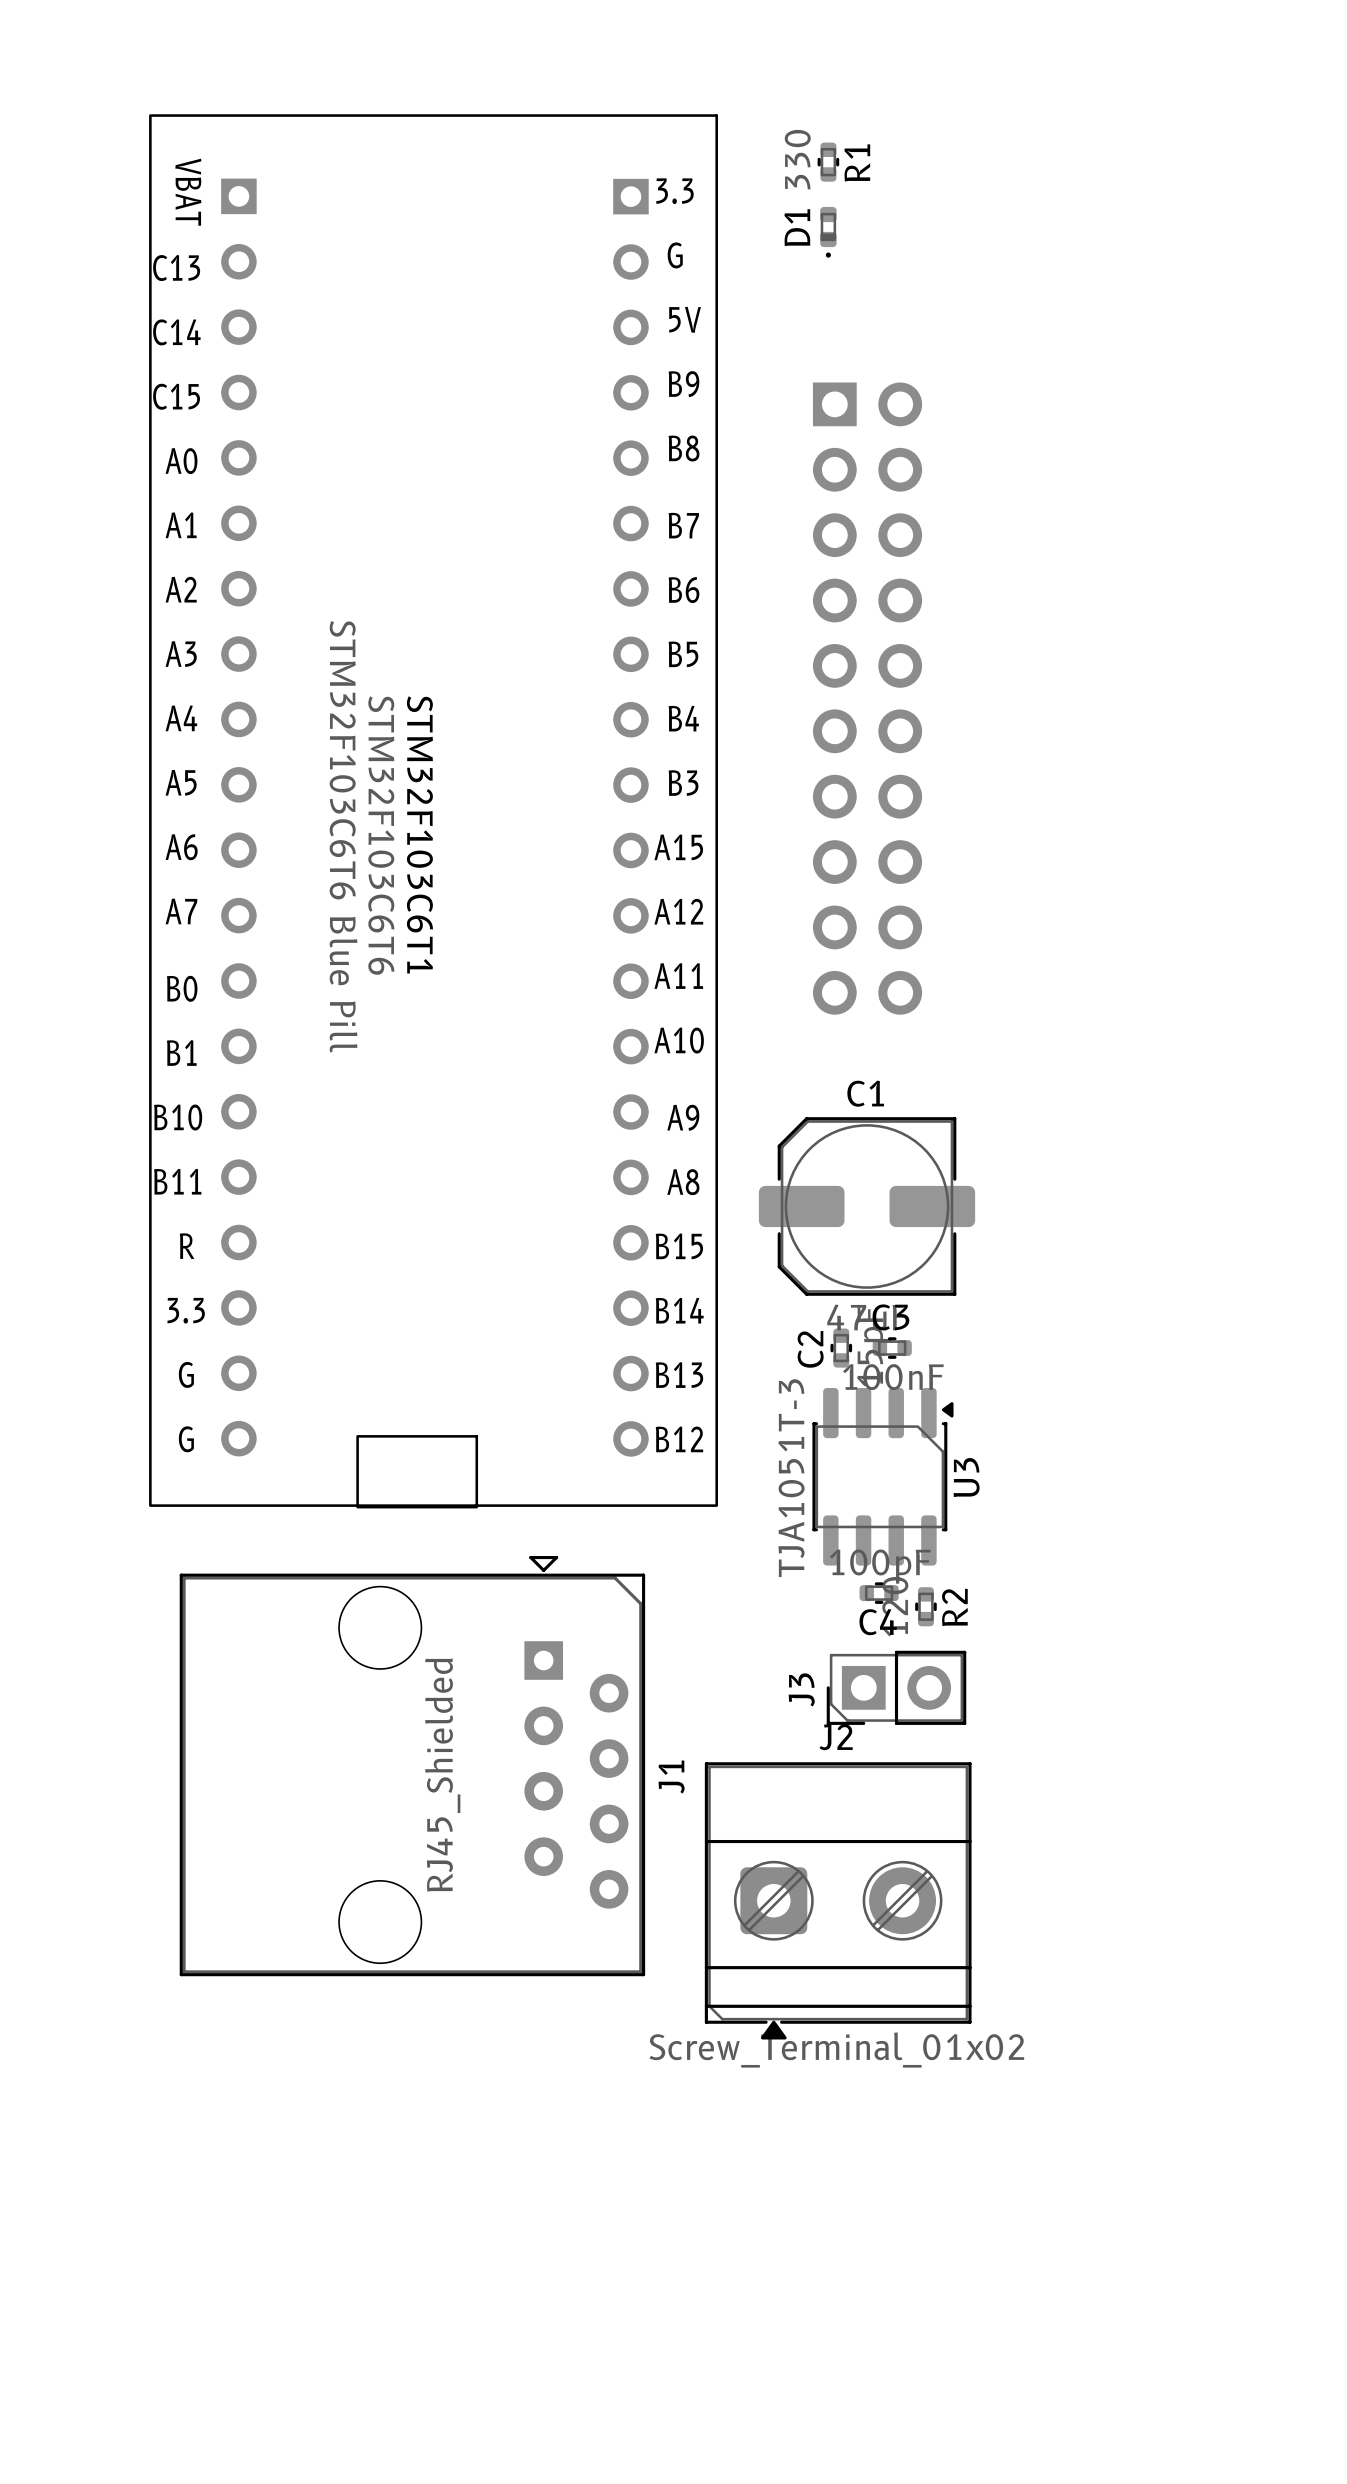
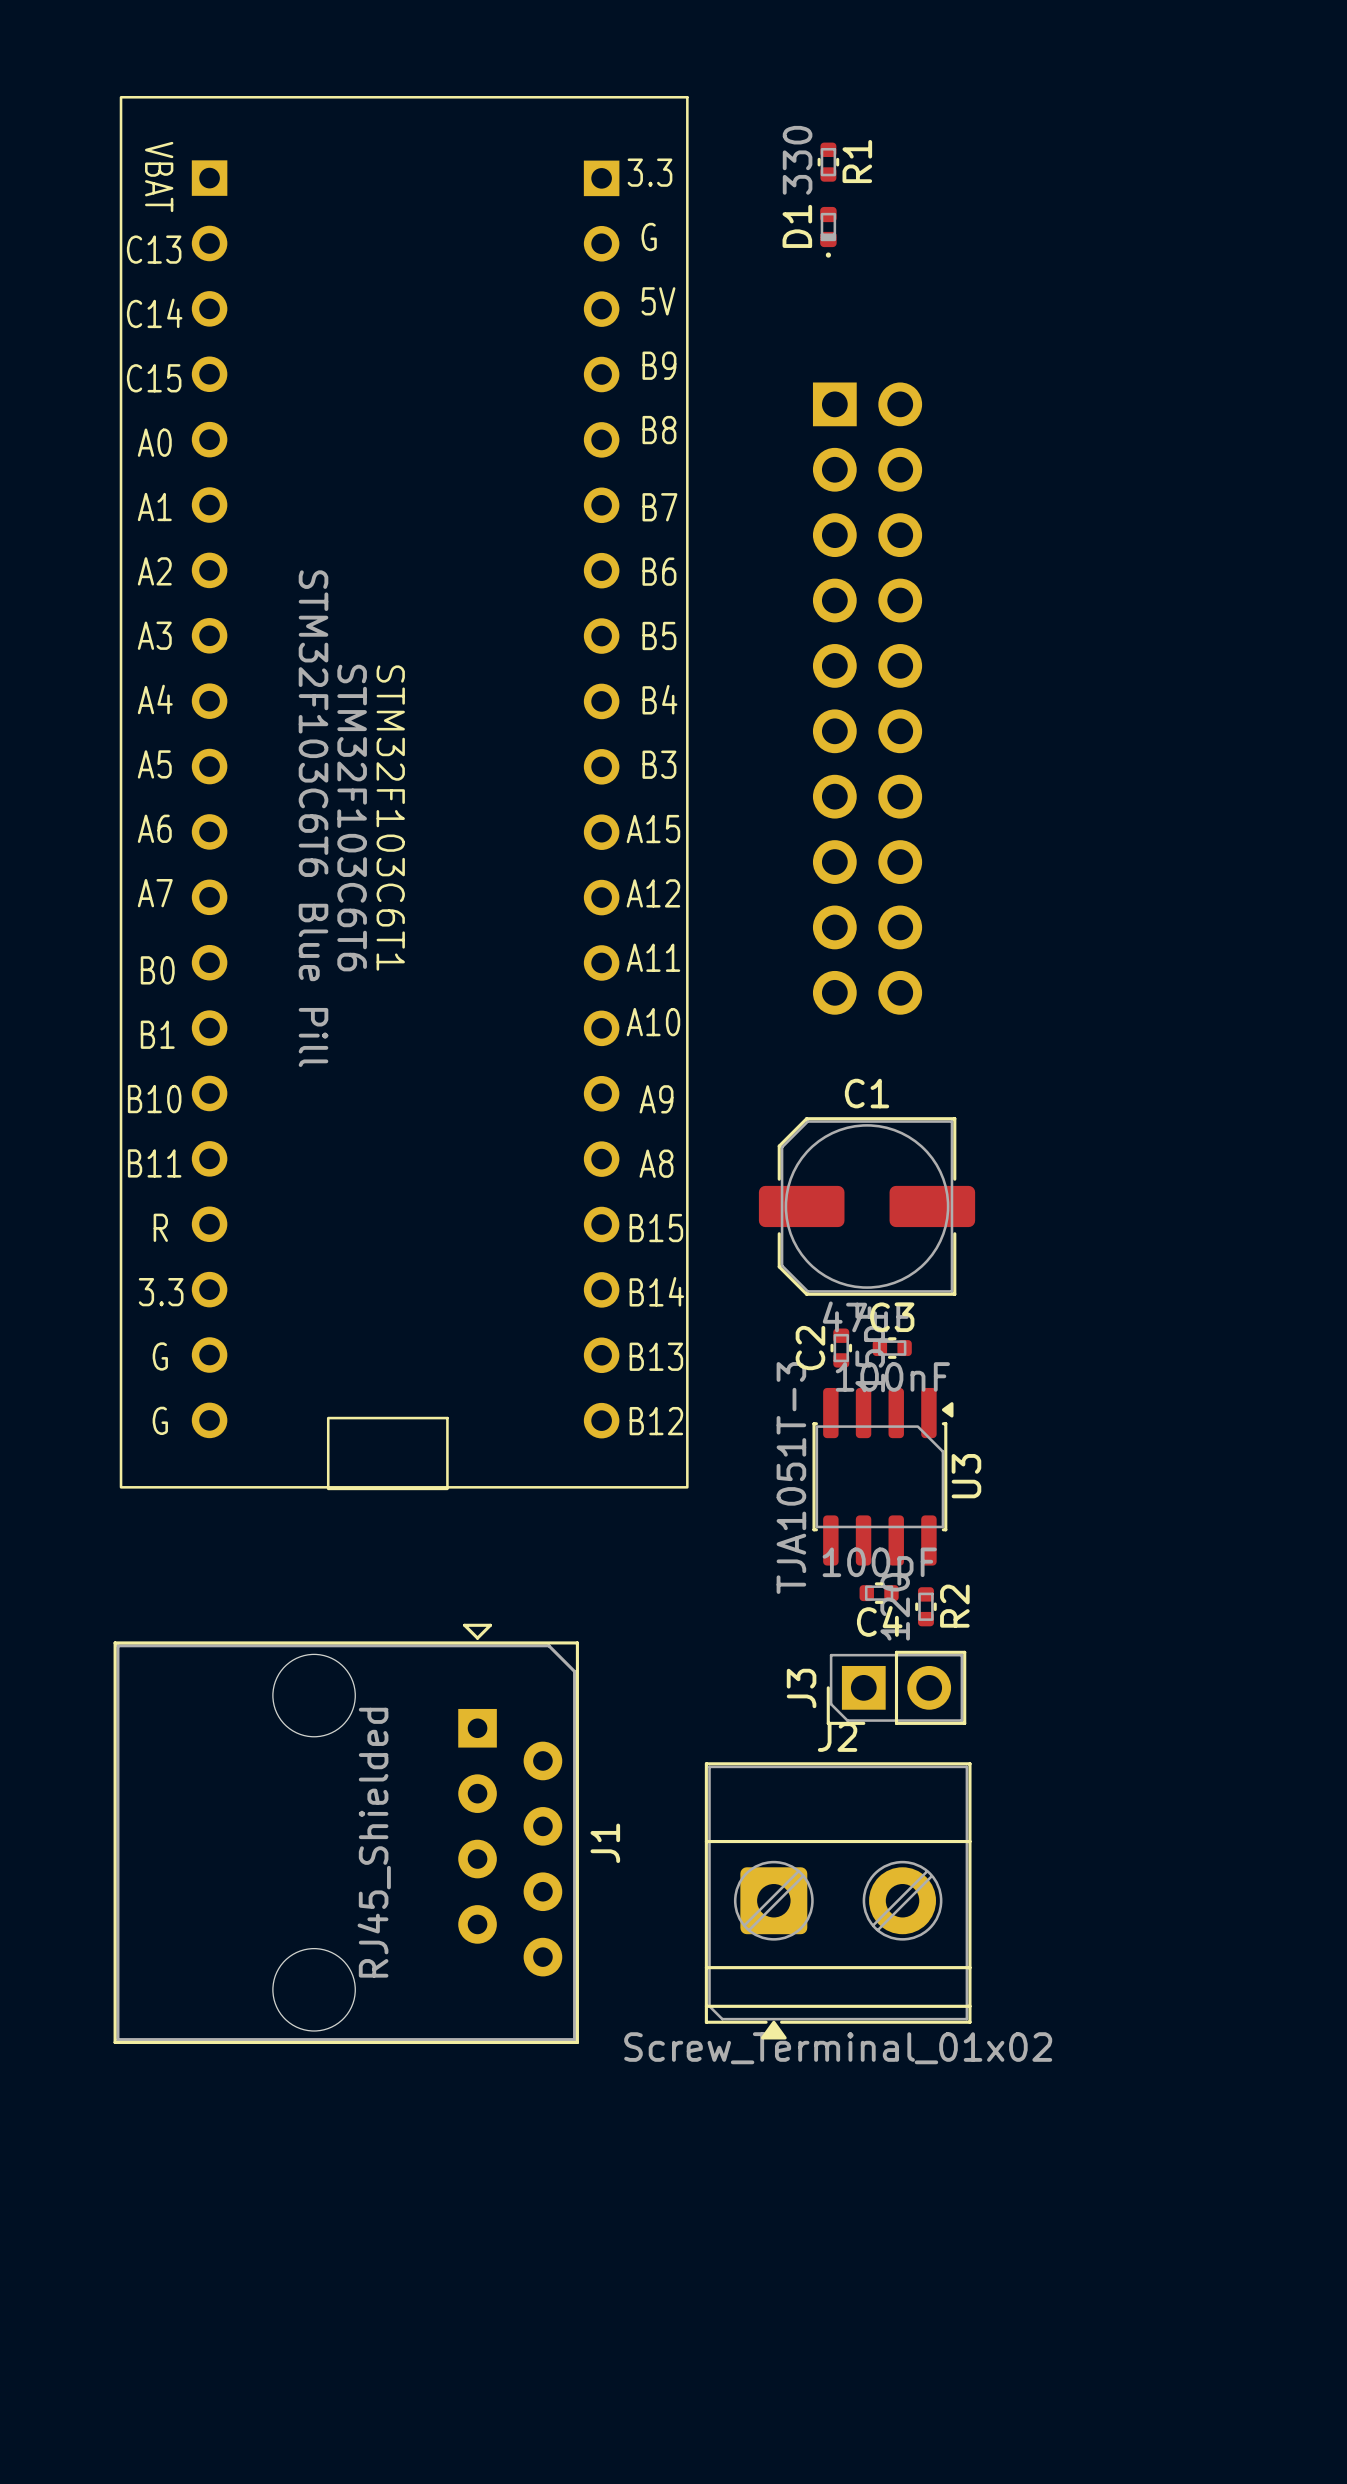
STM32F103C6T1 position: (433, 811) -> (404, 793)
J1 position: (412, 1766) -> (346, 1833)

